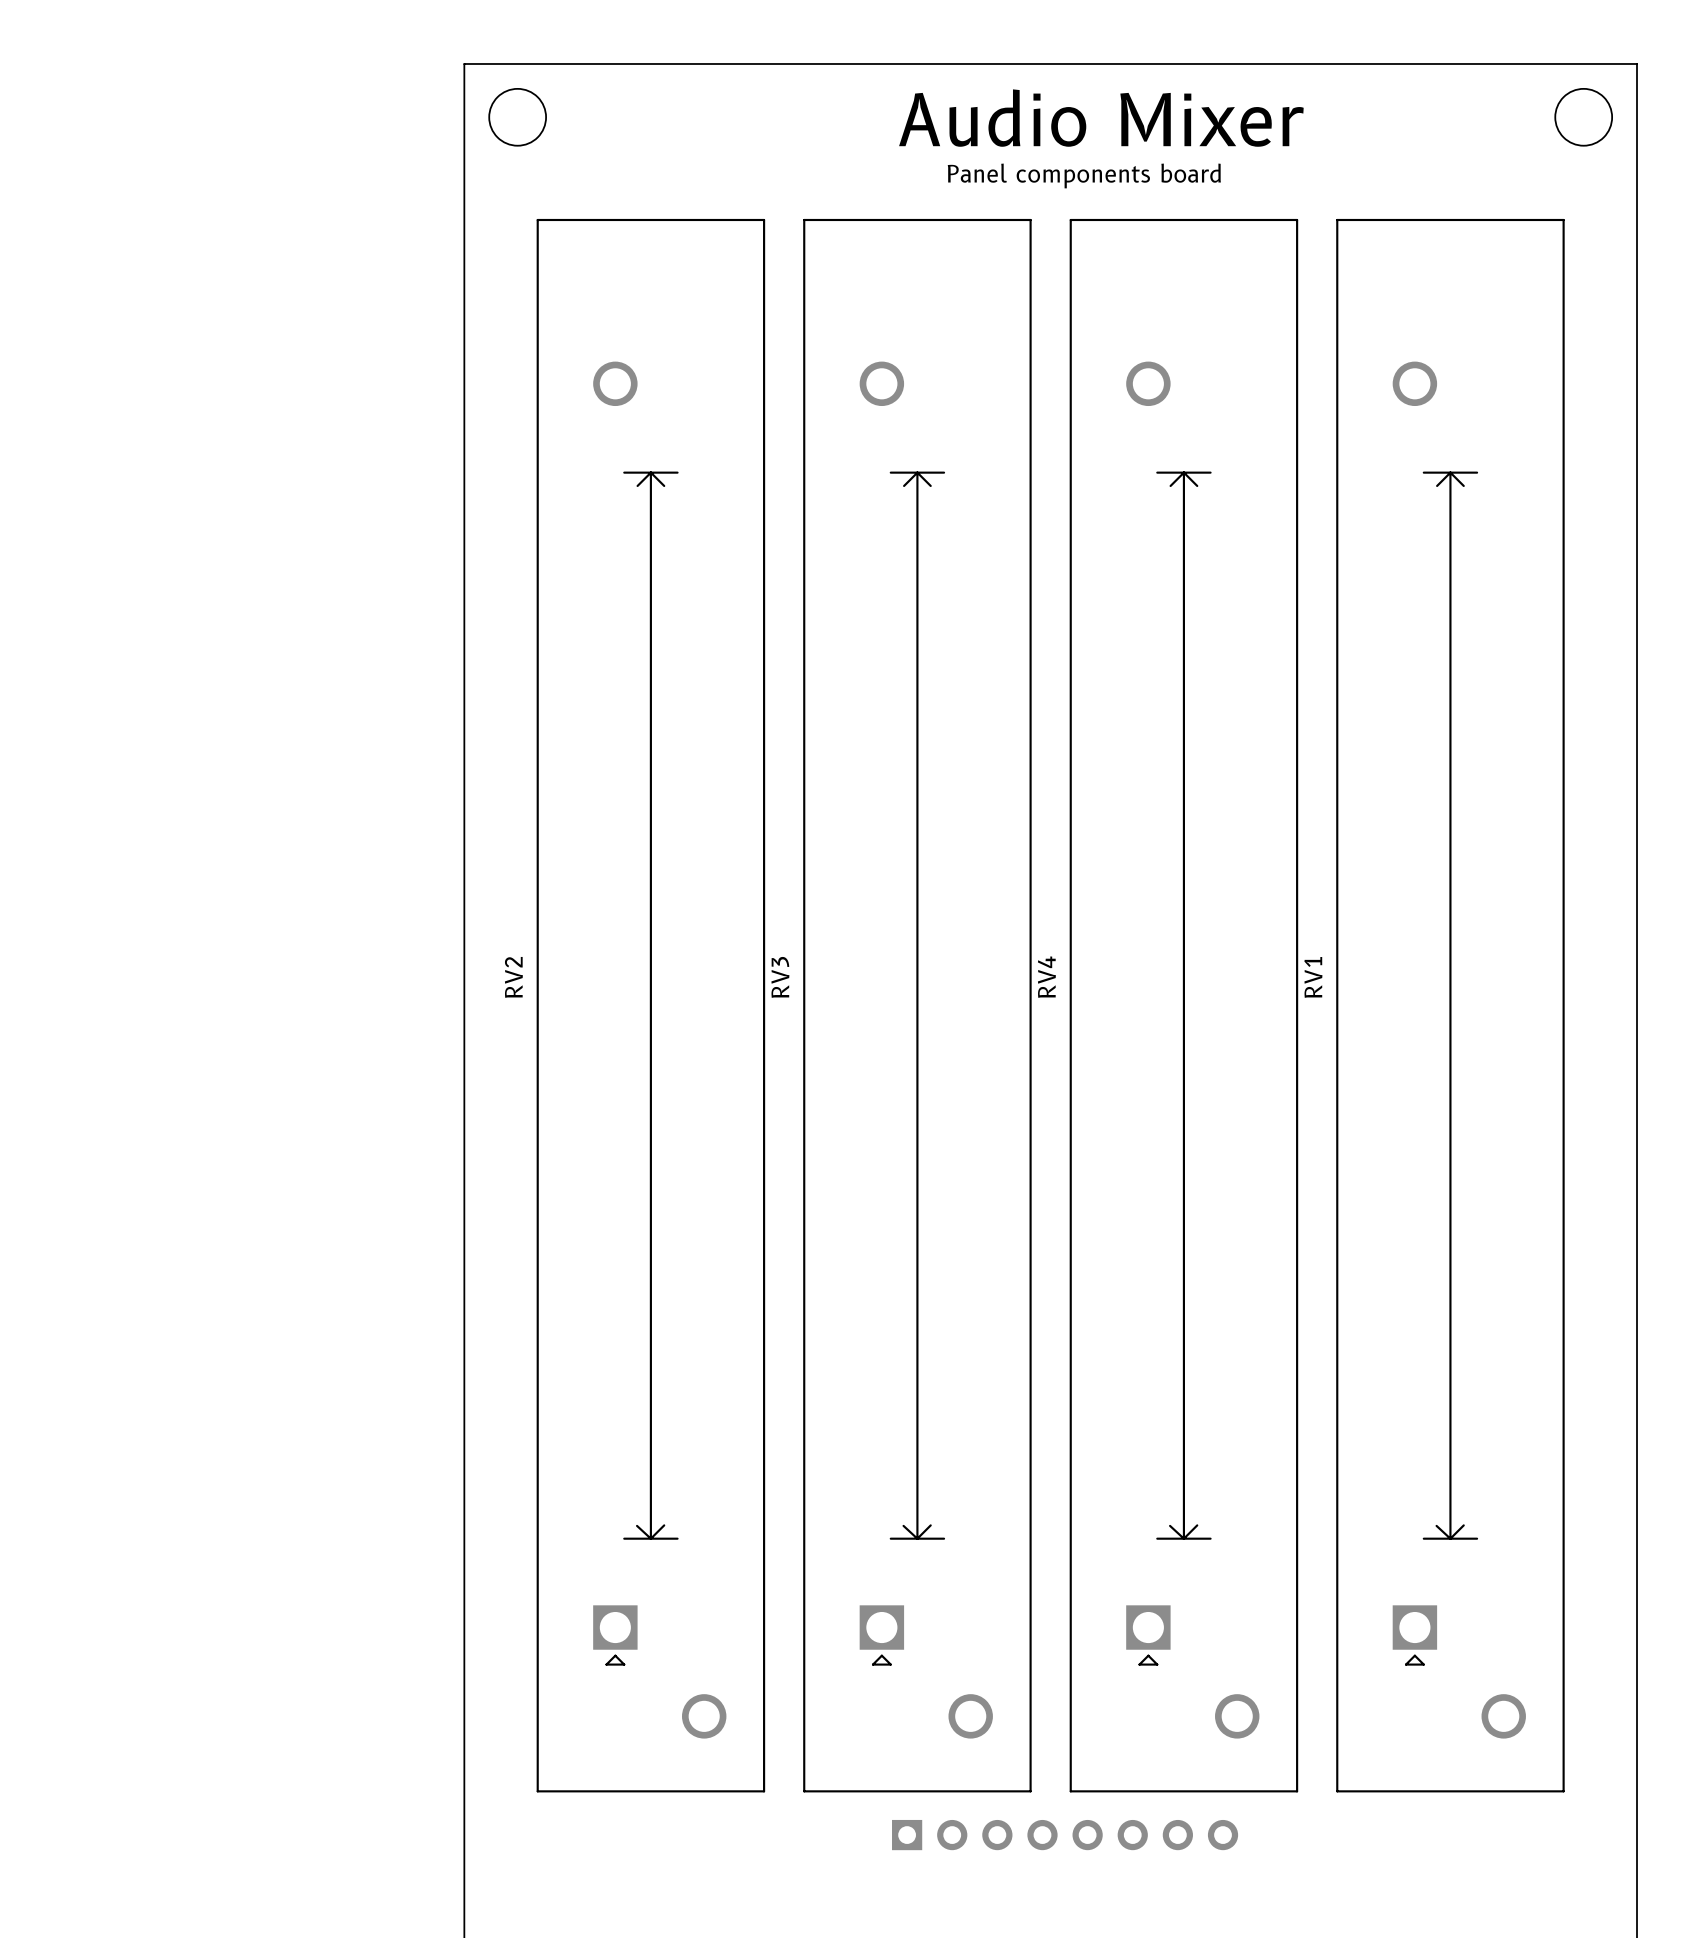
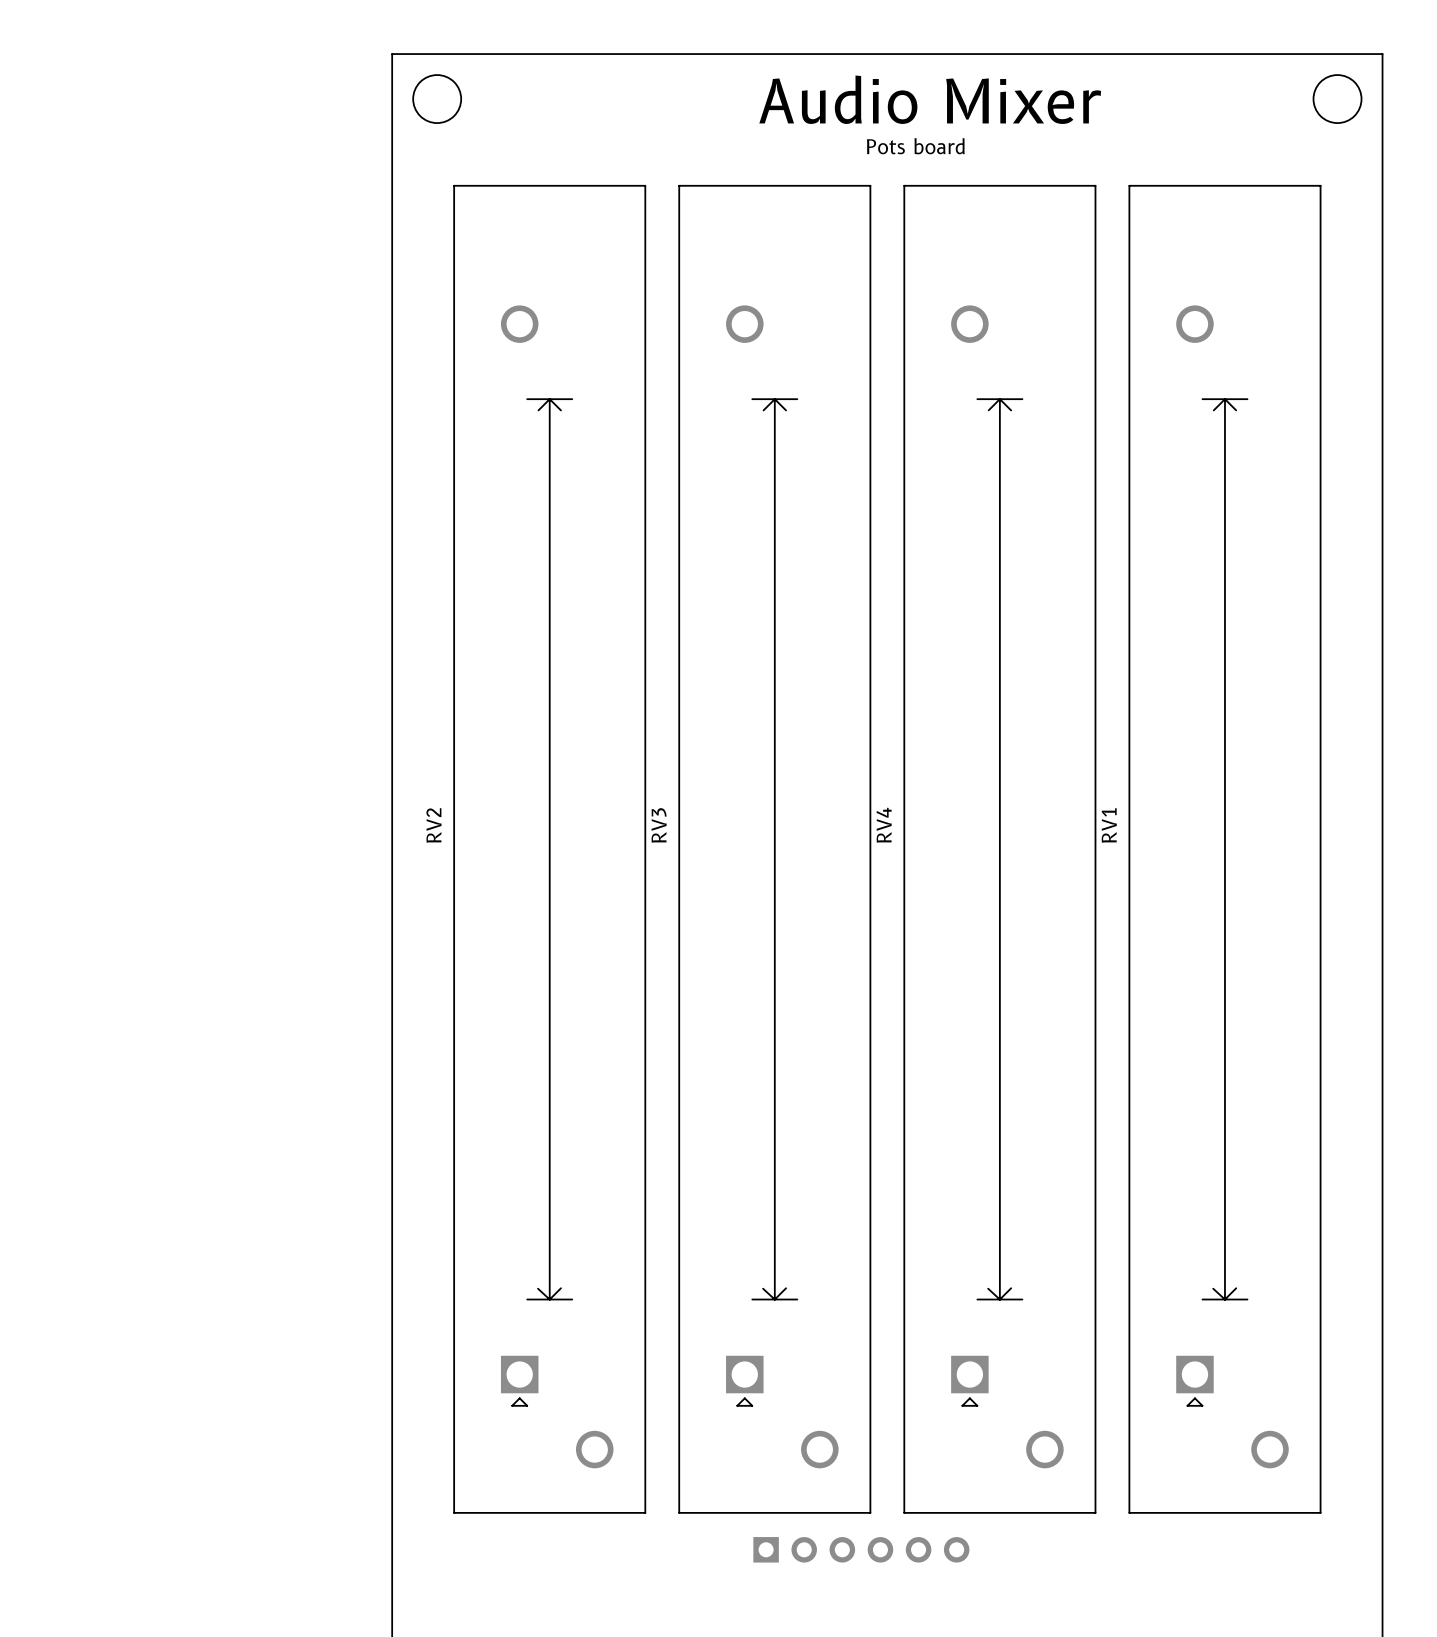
text: Panel components board (1084, 175) -> Pots board (915, 146)
part: (1065, 1835) -> none

